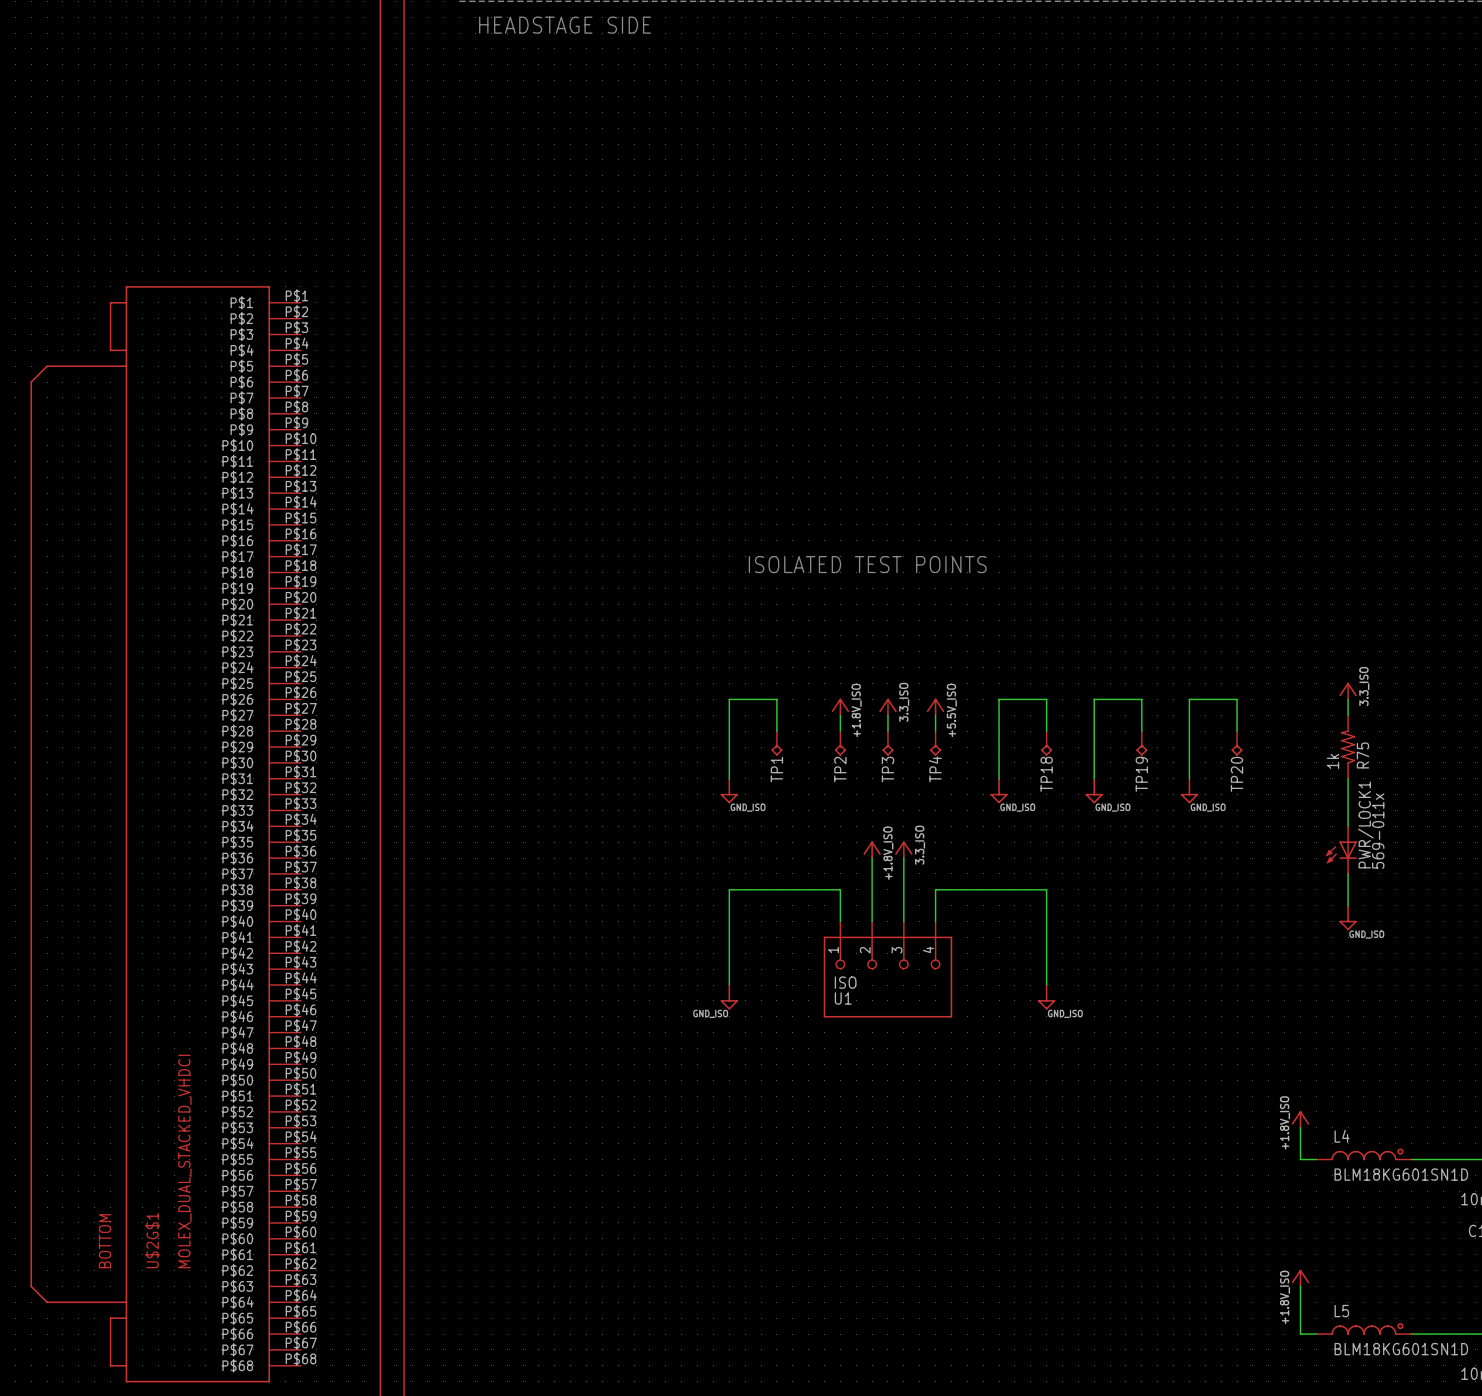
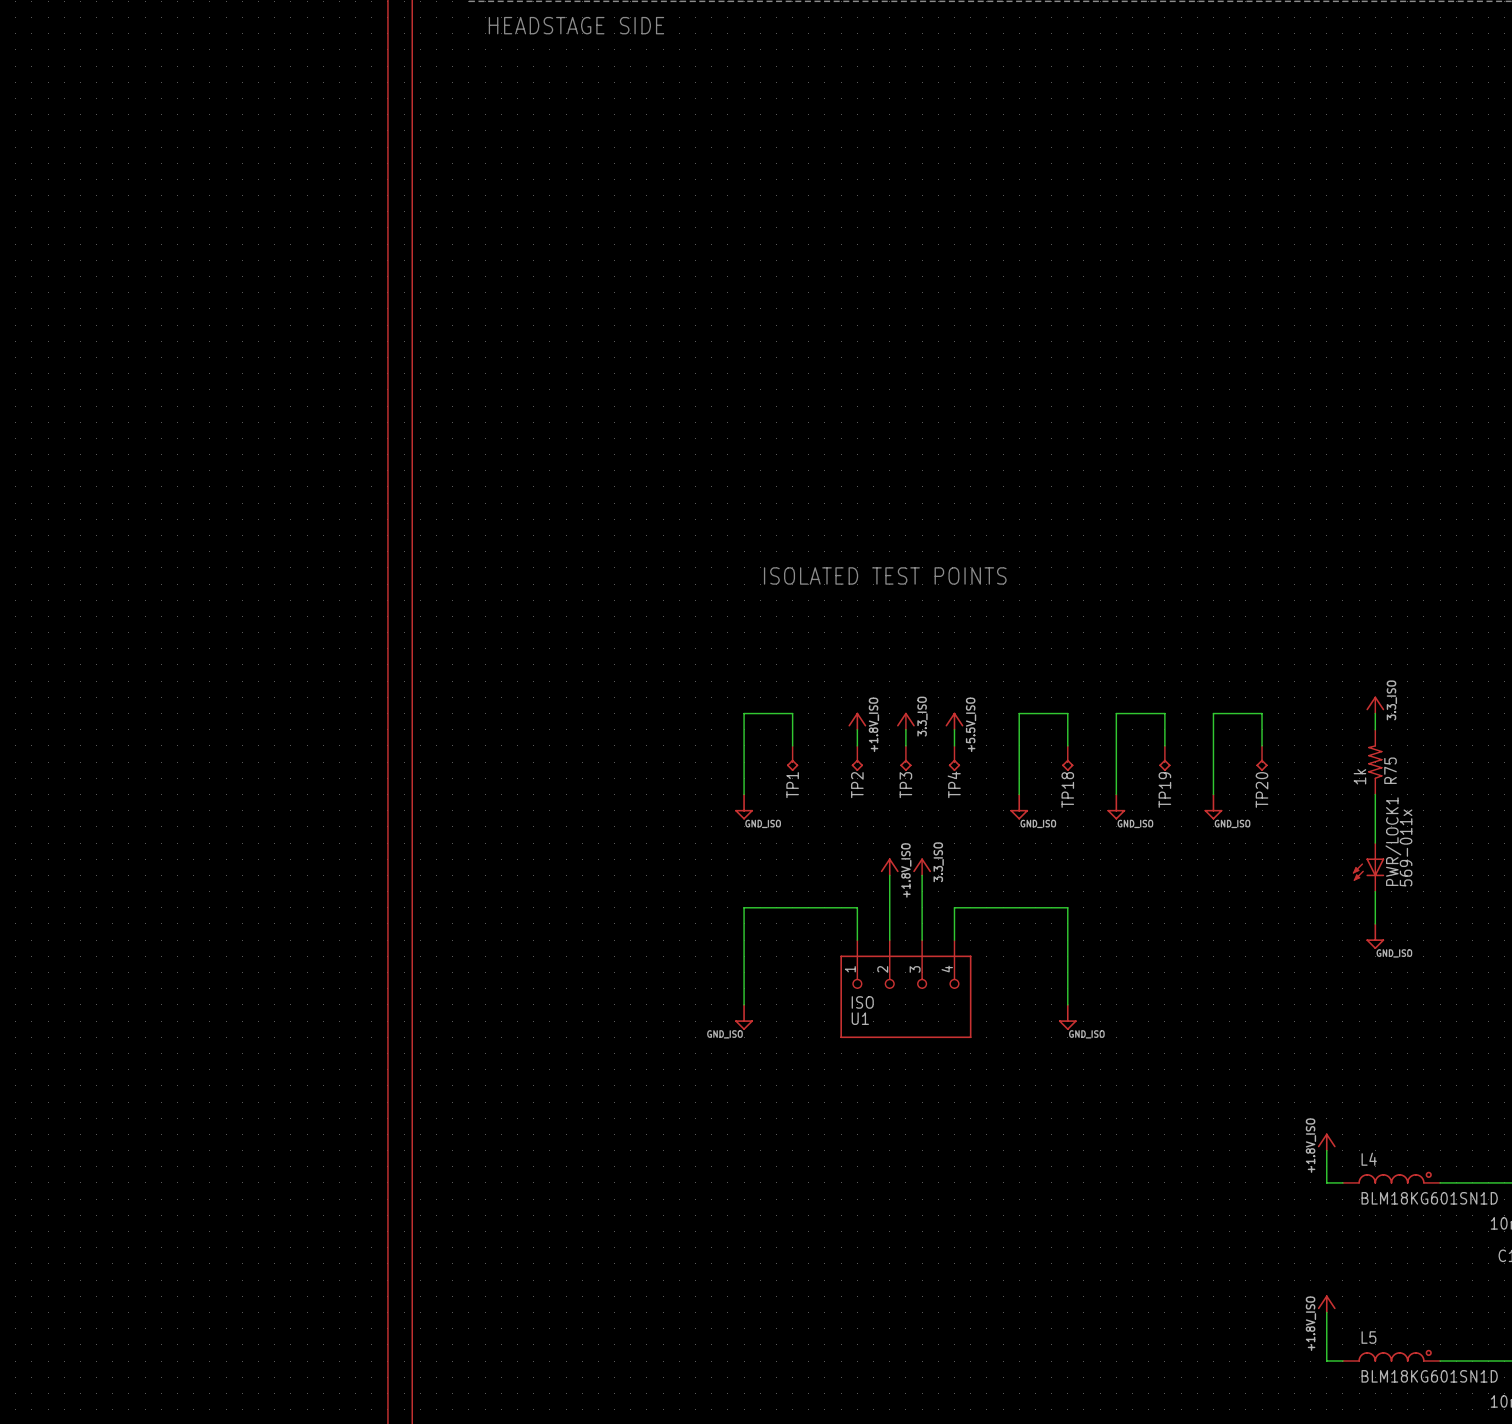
U$2G$1: MOLEX_DUAL_STACKED_VHDCI (165, 834) -> none

